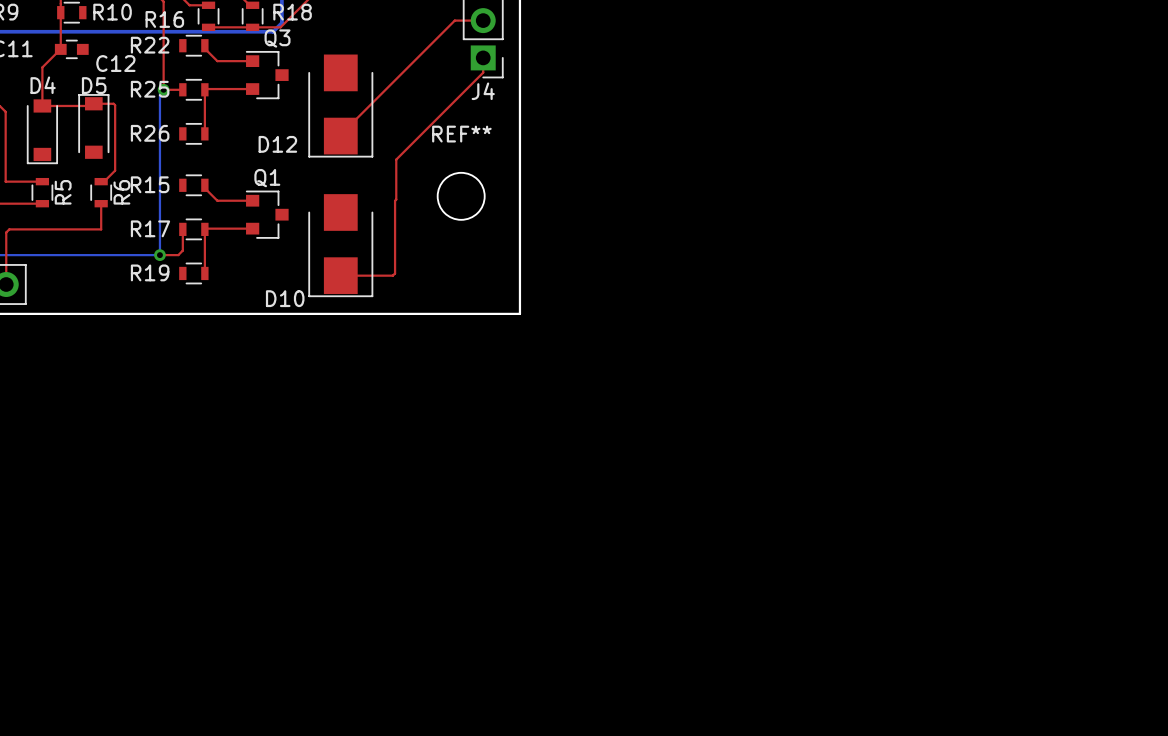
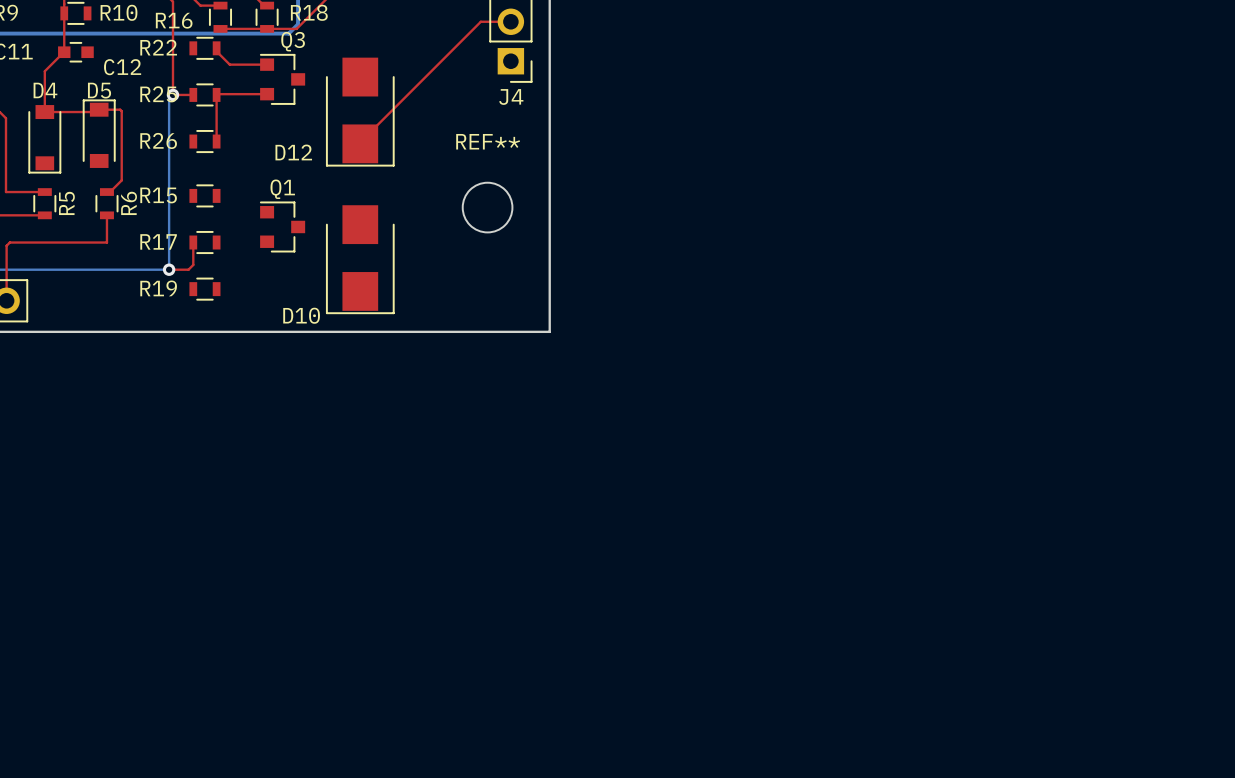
top track: (483, 57) (483, 72) (396, 159) (395, 273) (392, 275) (340, 275) -> none
top track: (204, 185) (204, 188) (217, 200) (252, 200) -> none
top track: (252, 228) (205, 228) (204, 273) -> none

